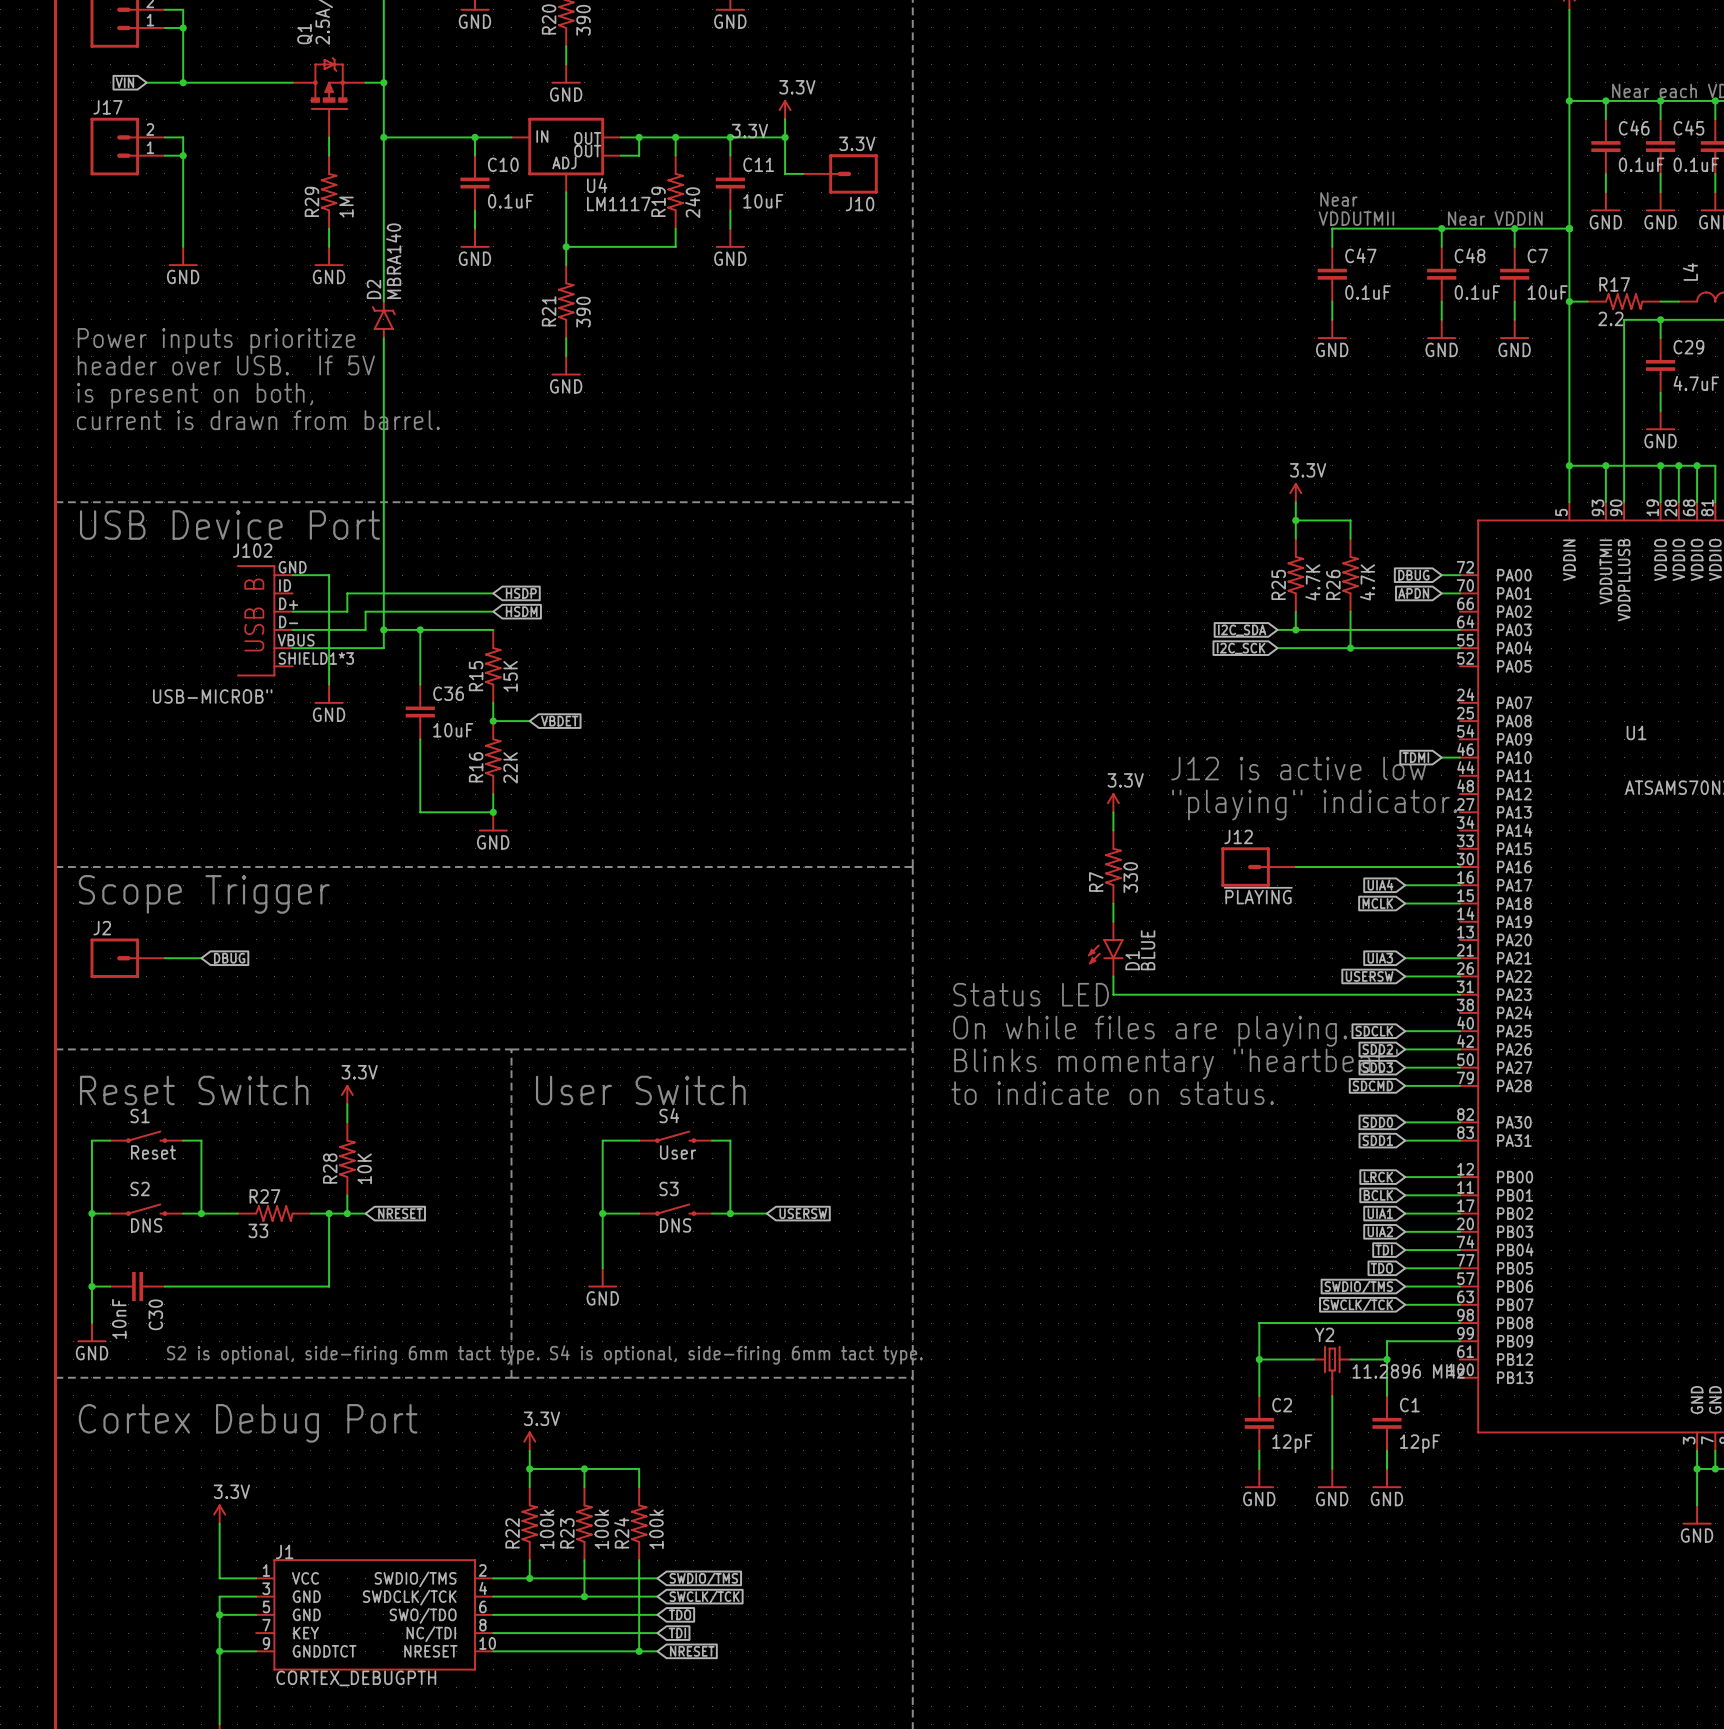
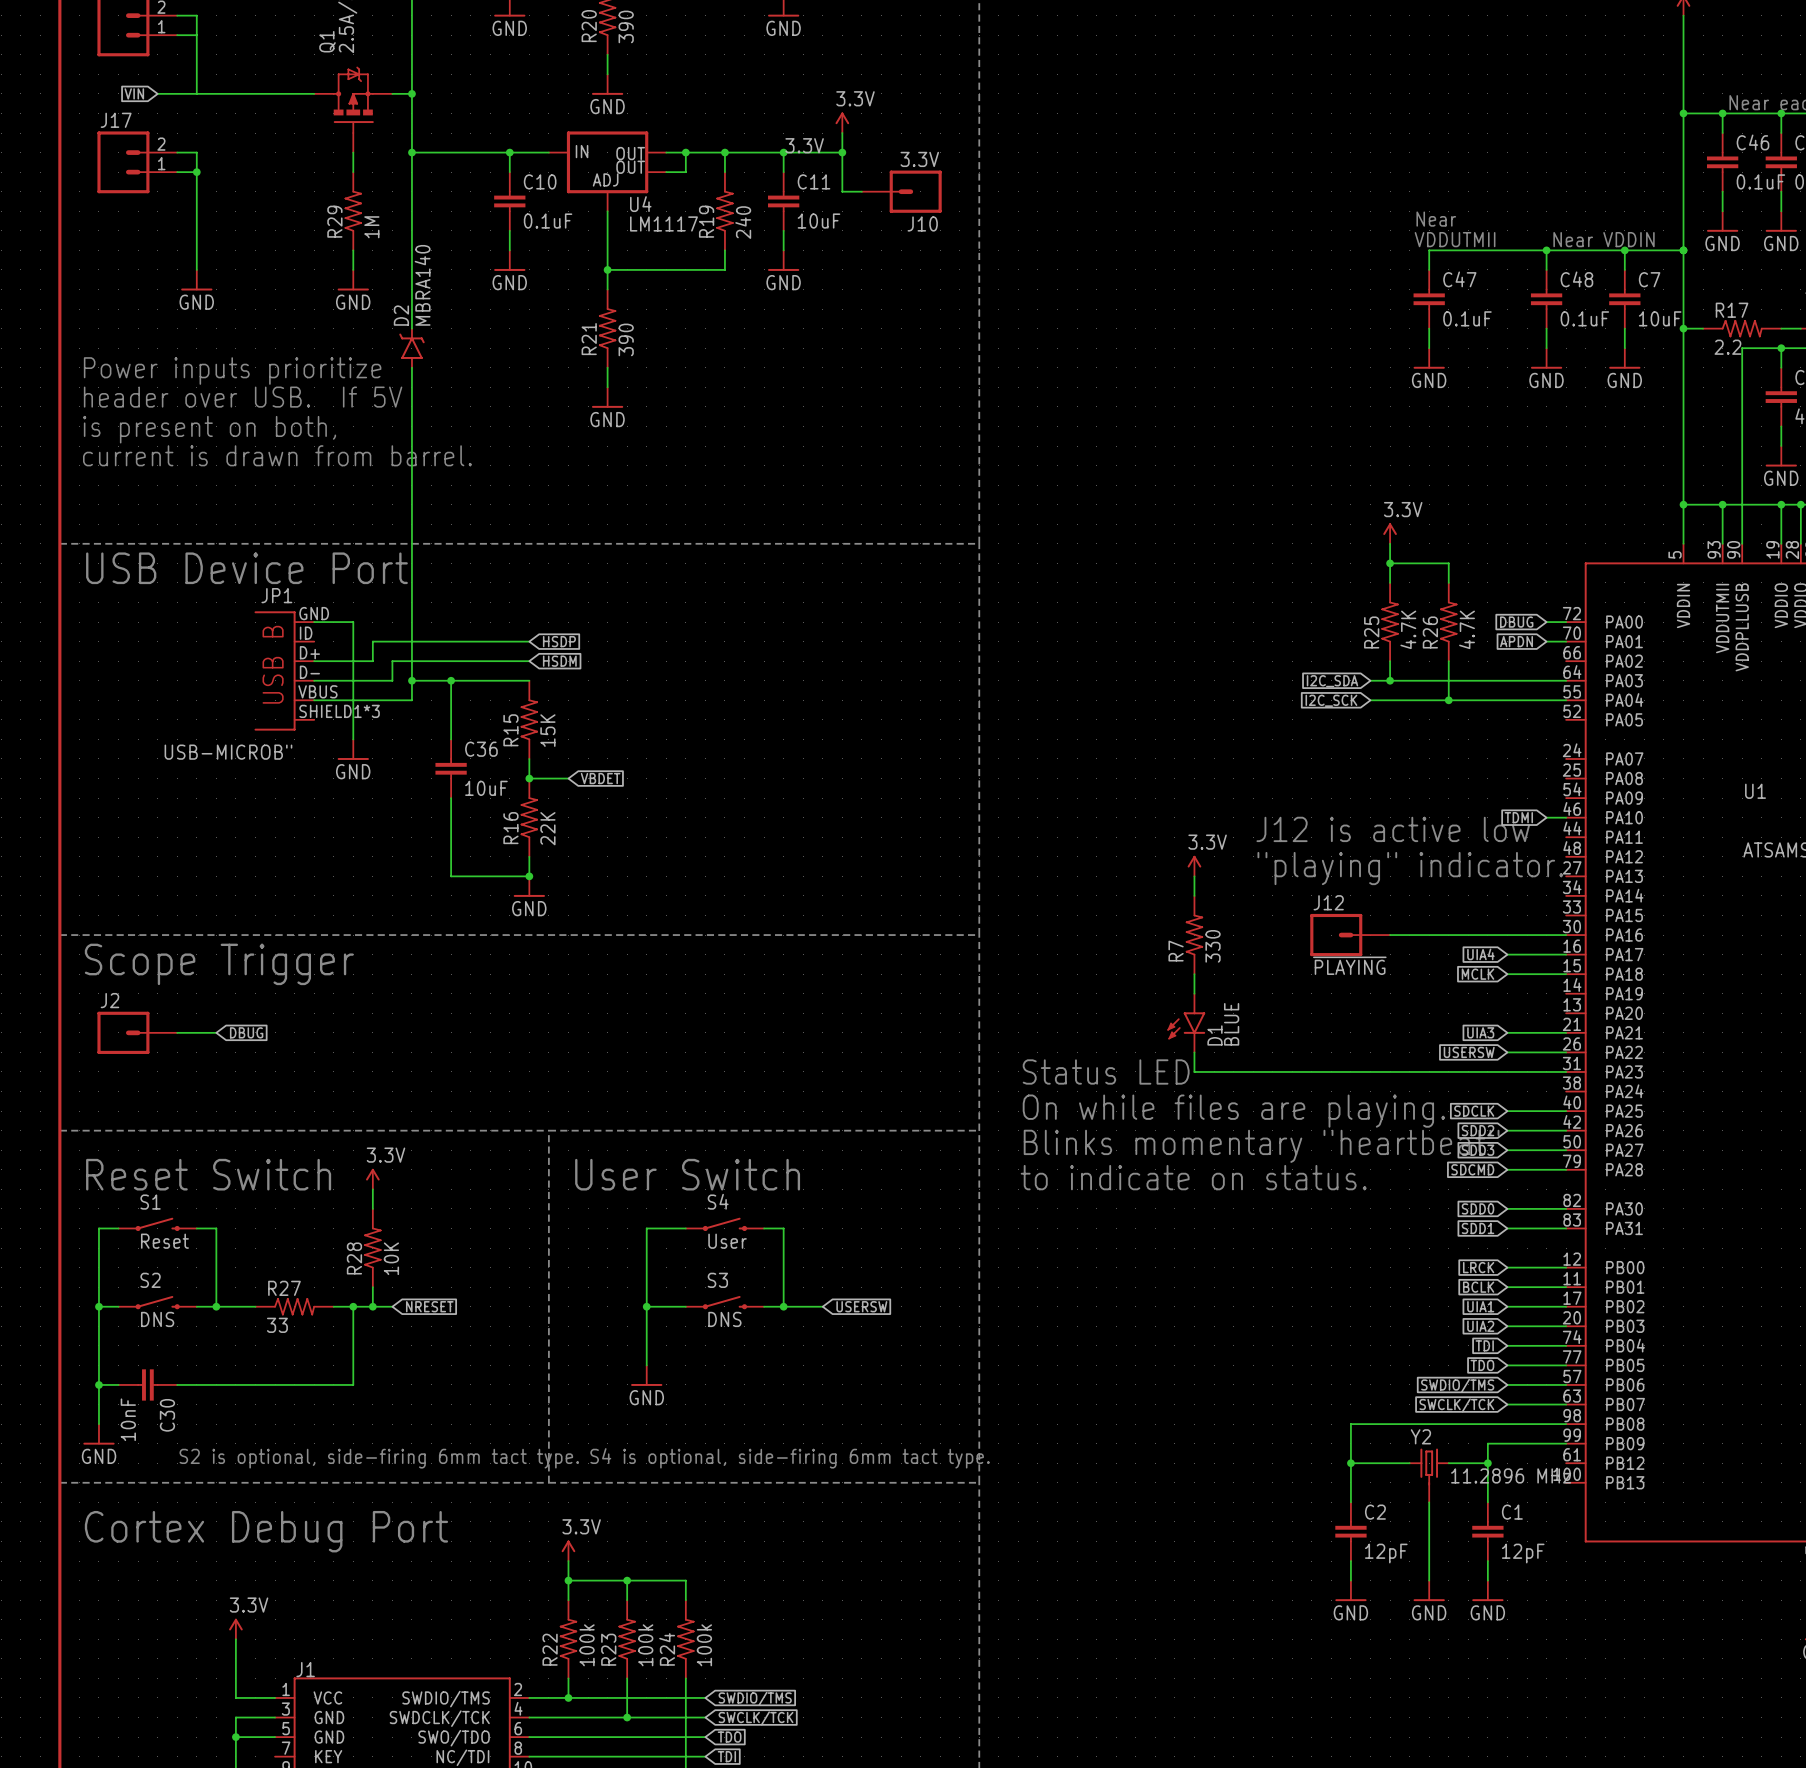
junction: (183, 27) -> none
junction: (183, 82) -> none
J102 name: J102 (252, 550) -> JP1 (276, 595)

